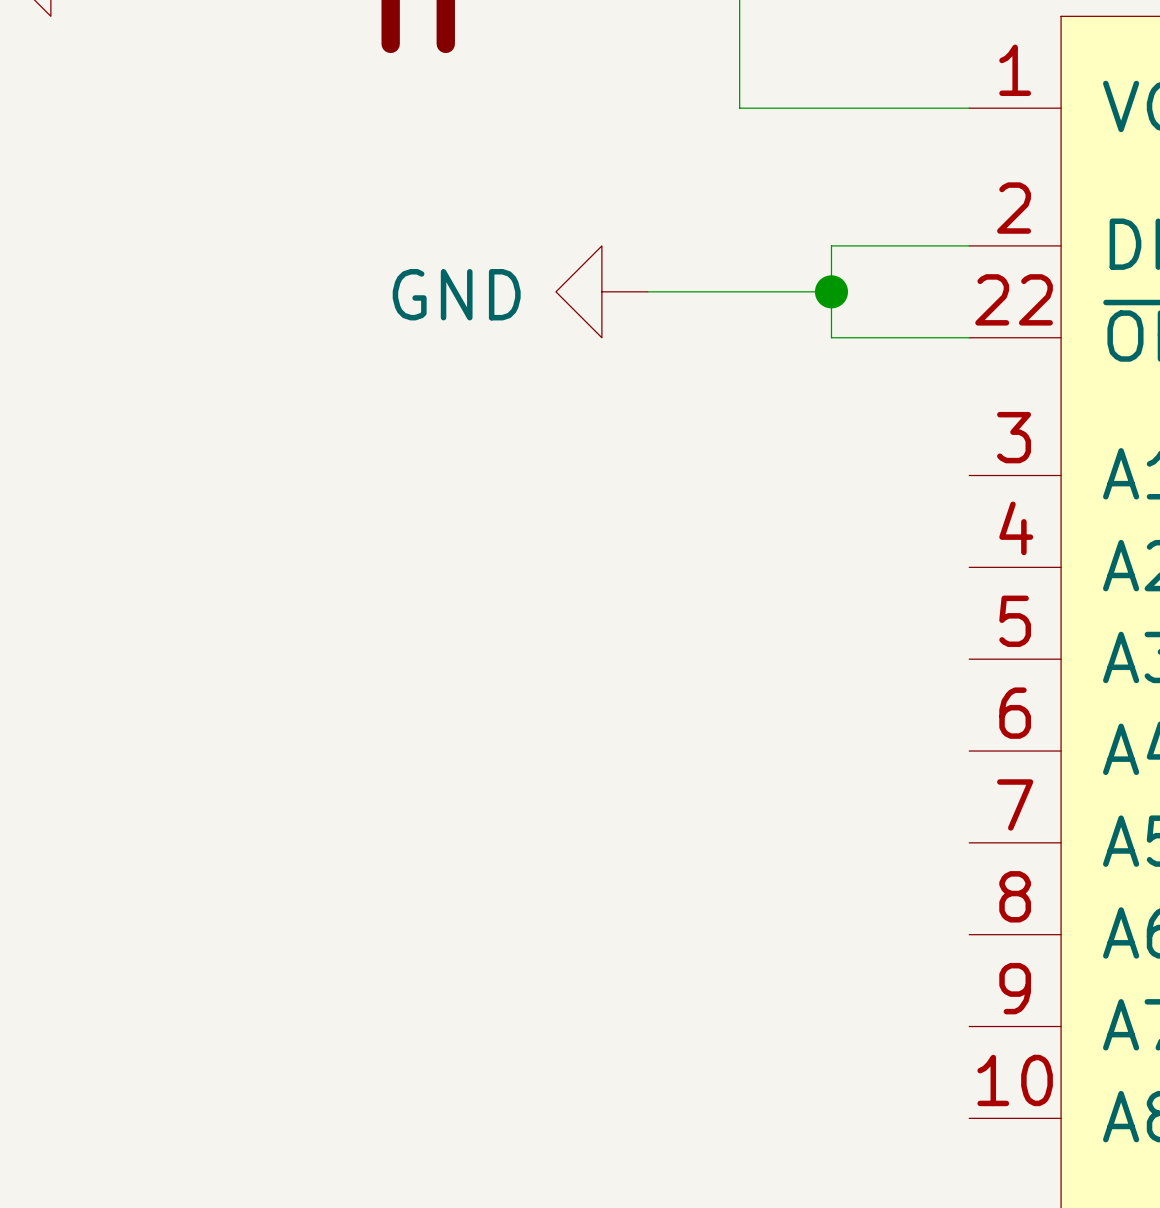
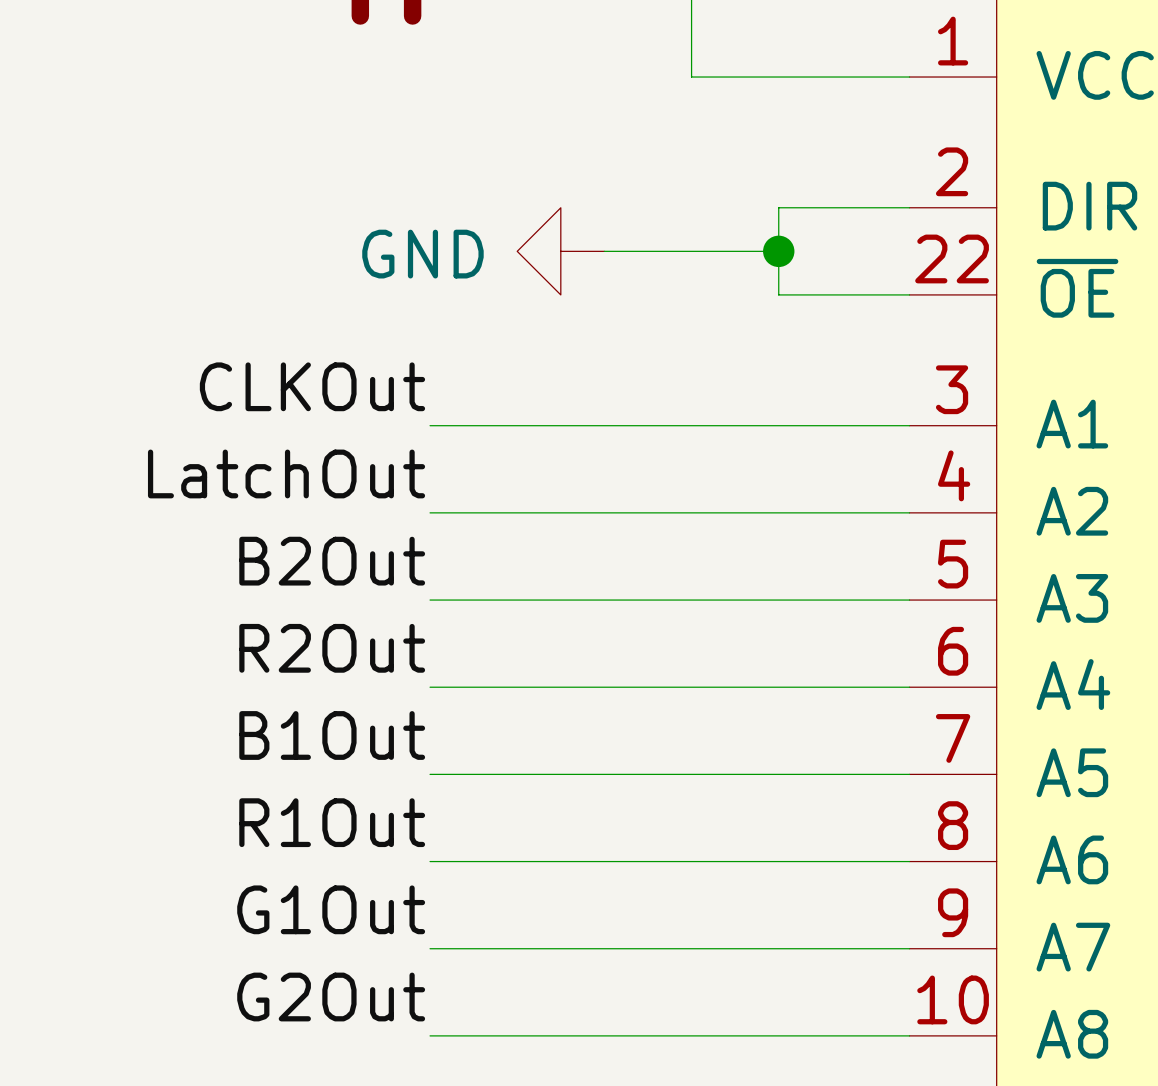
label: none -> CLKOut (312, 386)
wire: none -> (430, 425) (909, 425)
label: none -> LatchOut (286, 473)
wire: none -> (430, 512) (909, 512)
label: none -> B2Out (332, 561)
wire: none -> (430, 600) (909, 600)
label: none -> R2Out (332, 648)
wire: none -> (430, 687) (909, 687)
label: none -> B1Out (332, 735)
wire: none -> (430, 774) (909, 774)
label: none -> R1Out (332, 822)
wire: none -> (430, 861) (909, 861)
label: none -> G1Out (331, 909)
wire: none -> (430, 948) (909, 948)
label: none -> G2Out (331, 997)
wire: none -> (430, 1035) (909, 1035)

